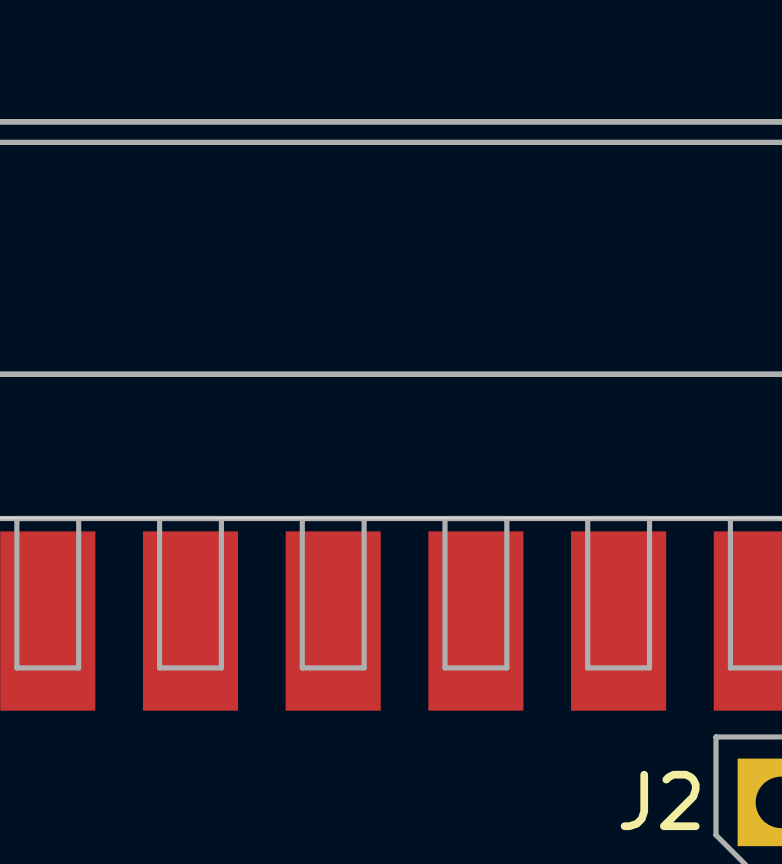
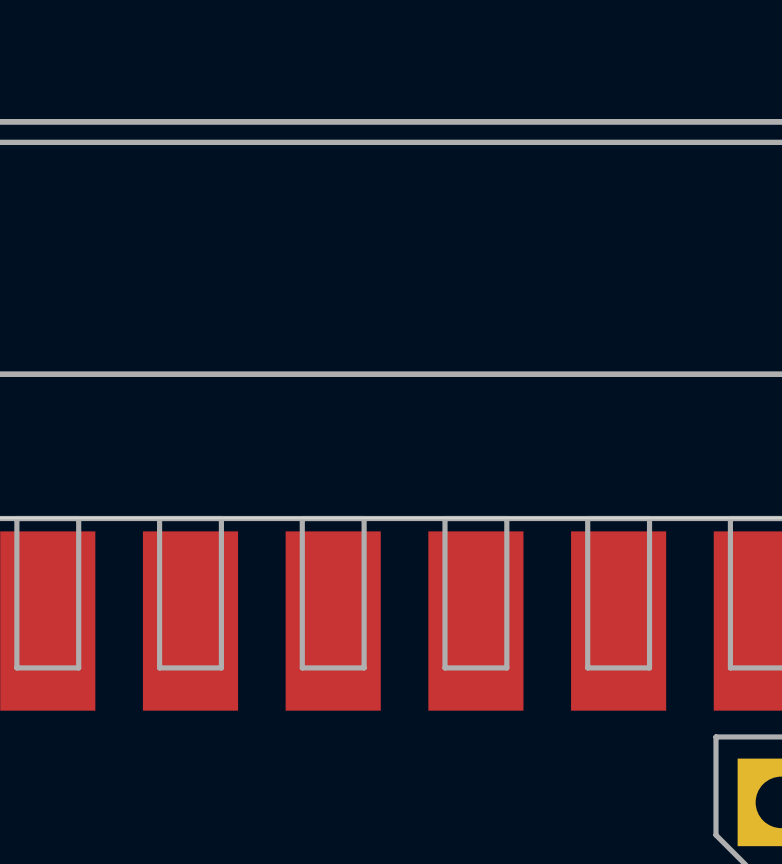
J2 name: J2 (660, 800) -> none

